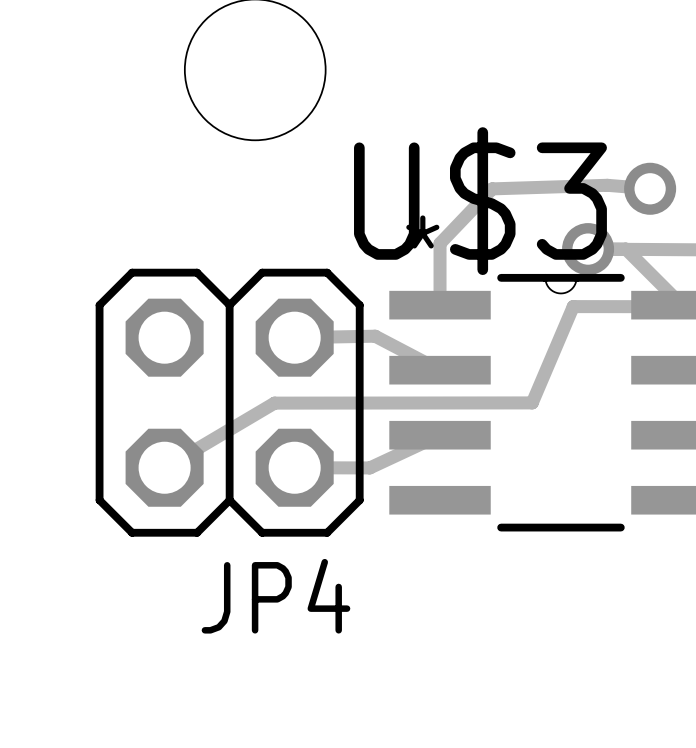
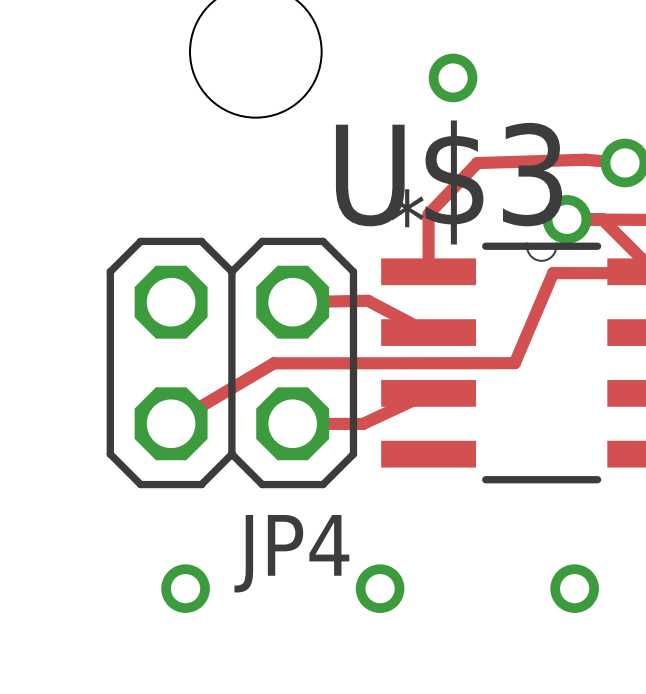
via: none -> (453, 77)
via: none -> (185, 588)
via: none -> (380, 588)
via: none -> (574, 588)

